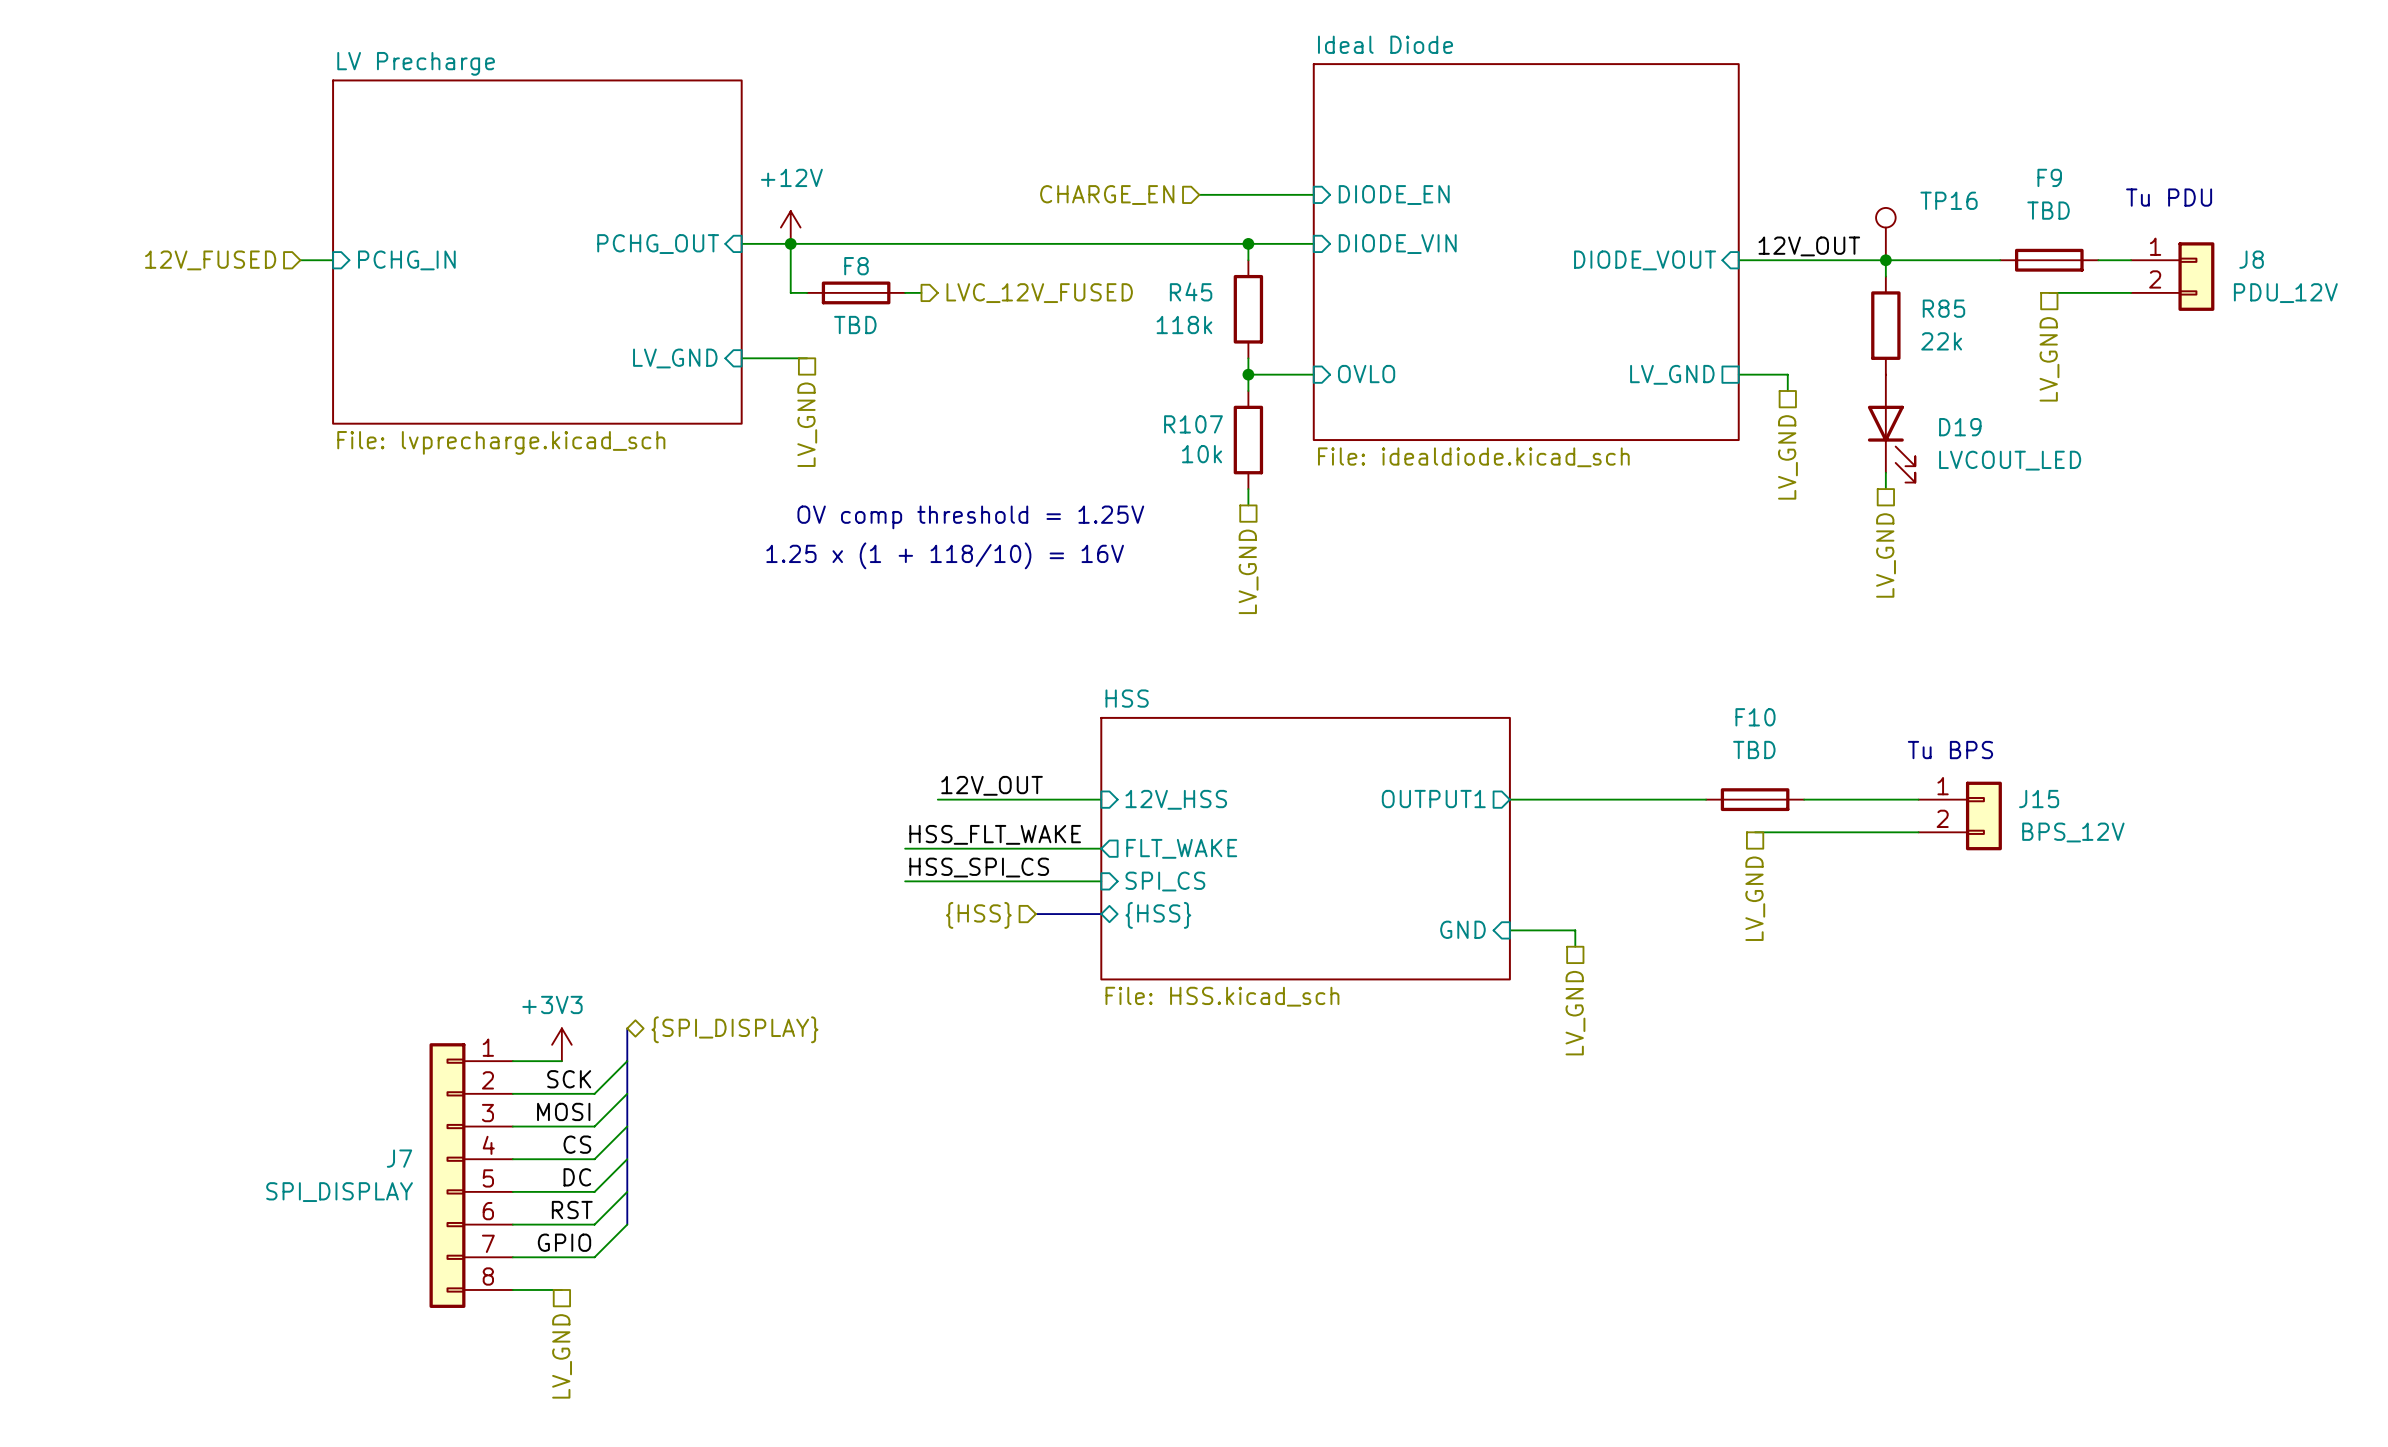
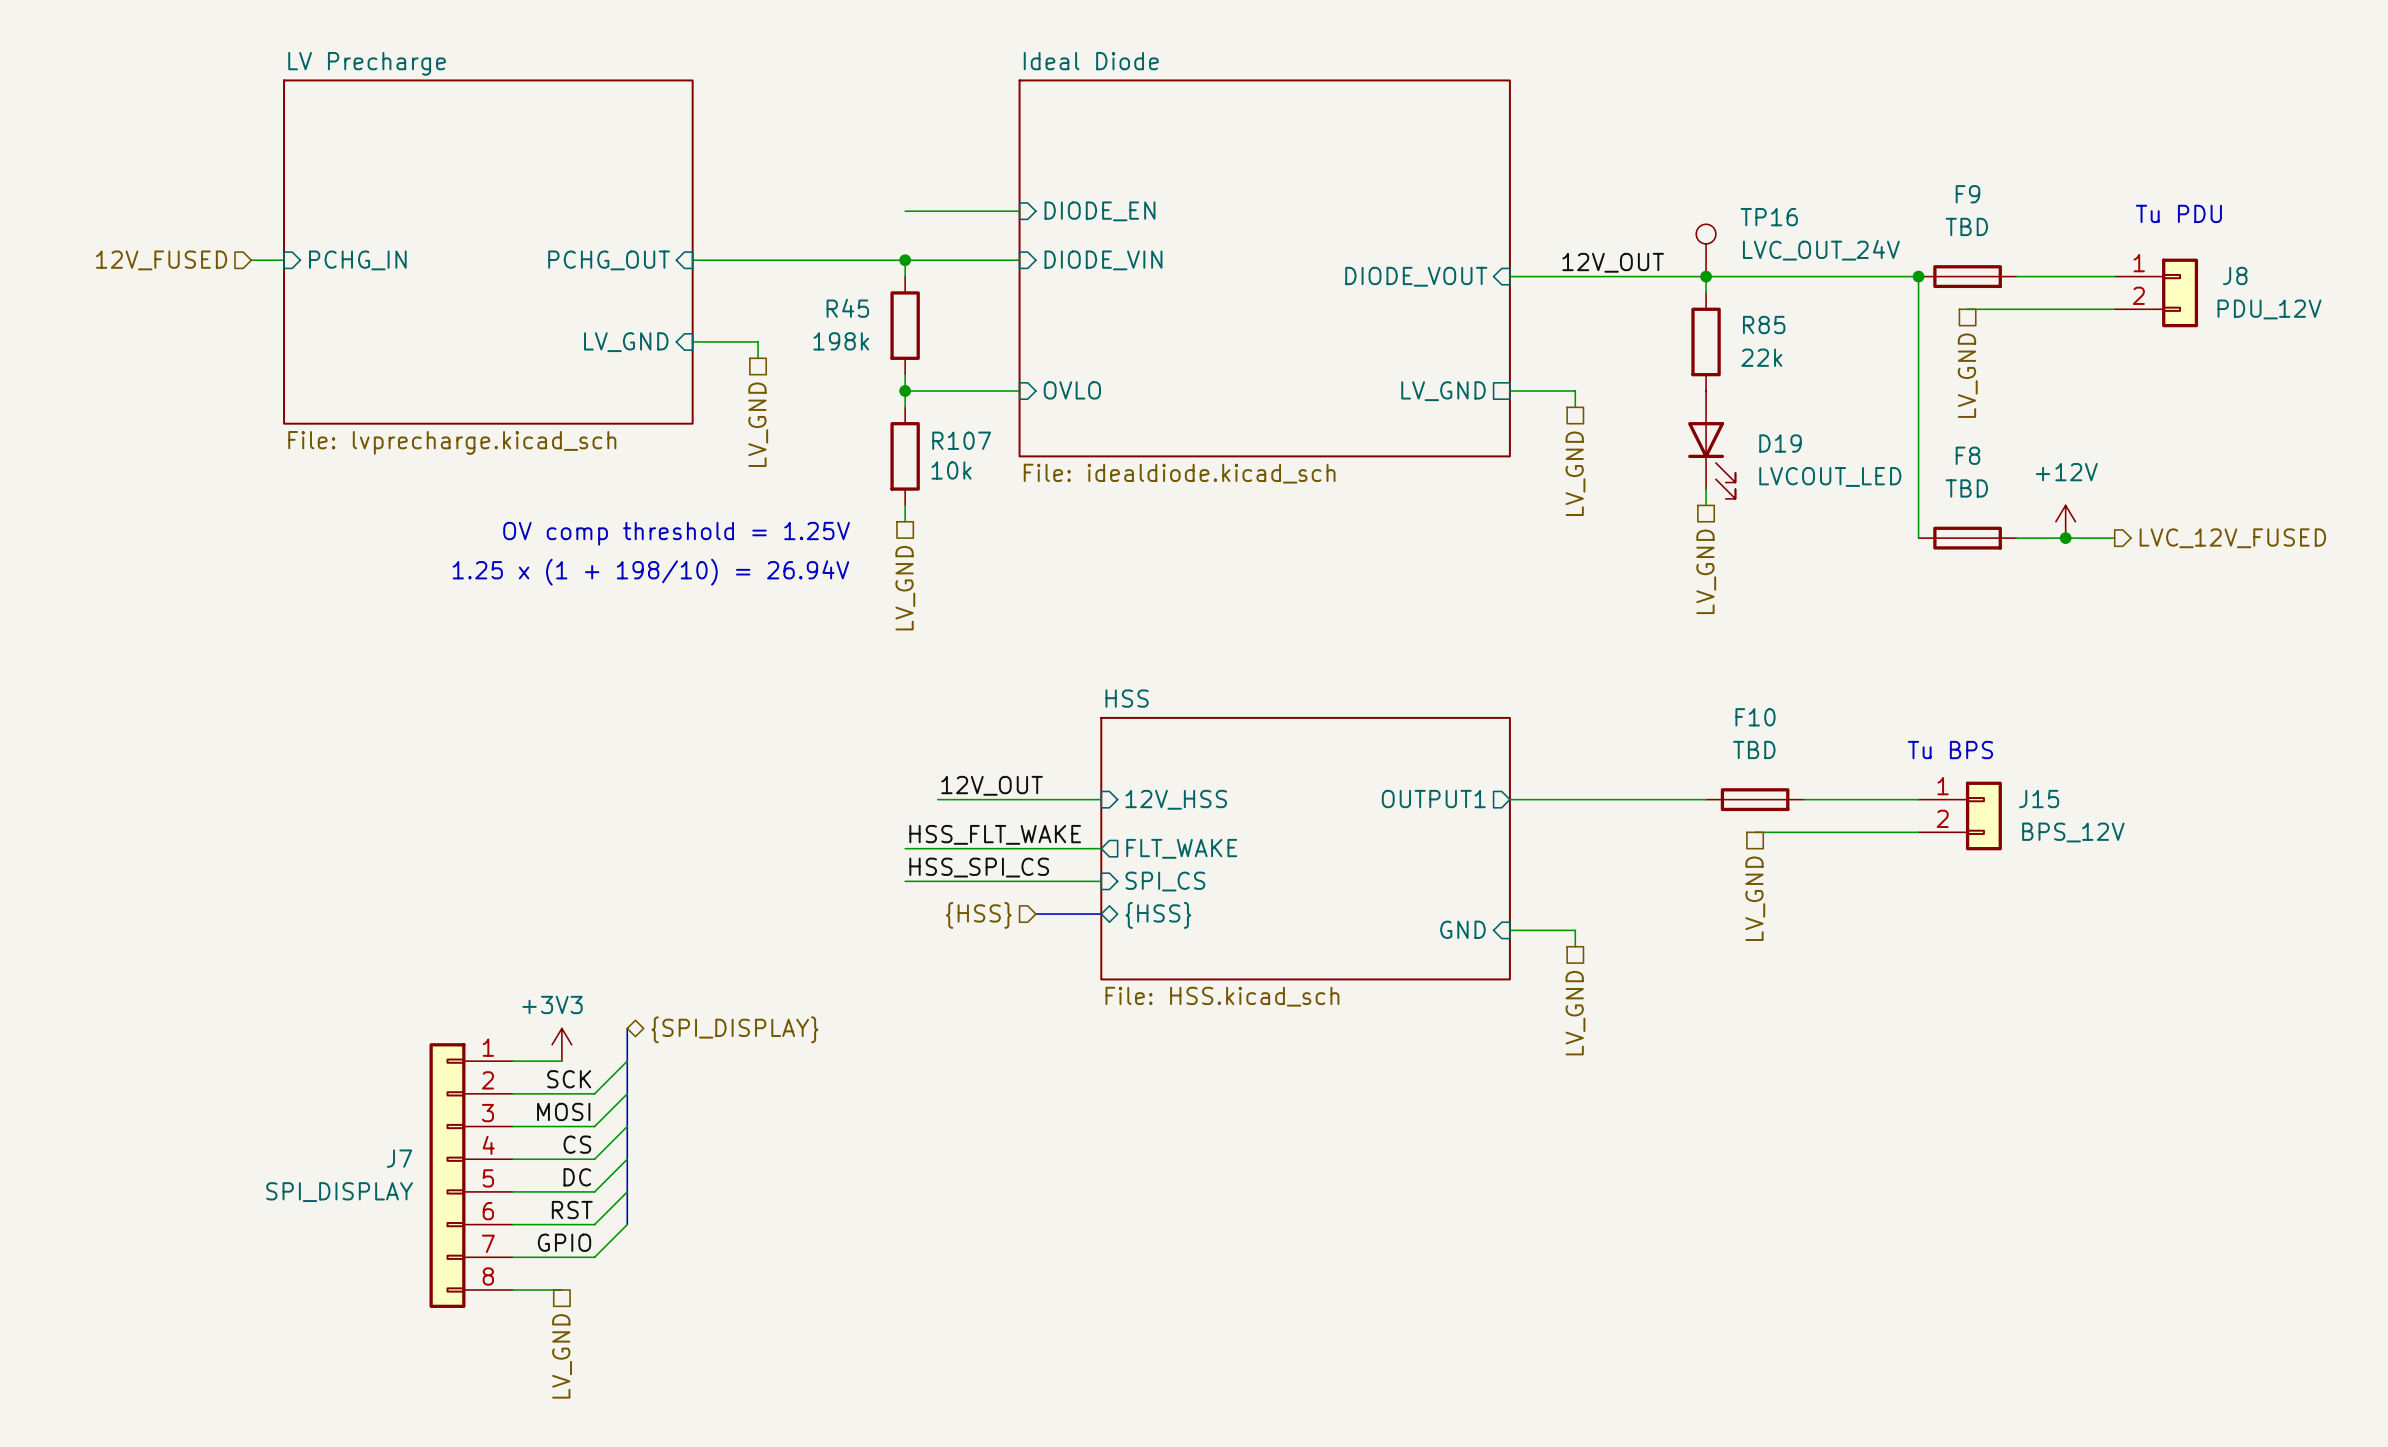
wire: (1199, 194) (1313, 194) -> (905, 211) (1019, 211)
hierarchical label: CHARGE_EN (1107, 195) -> none
sheet pin position: DIODE_EN (1394, 195) -> DIODE_EN (1099, 211)
text position: Tu PDU (2169, 197) -> Tu PDU (2178, 213)
power symbol: +12V (790, 227) -> none
TP16 position: (1885, 234) -> (1706, 250)
wire: (741, 243) (1313, 243) -> none
wire: (790, 243) (790, 292) (807, 292) -> none
junction: (790, 243) -> none
wire: (1248, 243) (1248, 260) -> none
junction: (1248, 243) -> none
sheet pin position: PCHG_OUT (658, 244) -> PCHG_OUT (609, 260)
sheet pin position: DIODE_VIN (1397, 244) -> DIODE_VIN (1103, 260)
label position: 12V_OUT (1809, 246) -> 12V_OUT (1613, 262)
TP16 value: none -> LVC_OUT_24V (1821, 250)
sheet LV Precharge position: (537, 252) -> (488, 252)
sheet Ideal Diode: File: idealdiode.kicad_sch (1526, 252) -> none
hierarchical label position: 12V_FUSED (210, 260) -> 12V_FUSED (161, 260)
wire: (300, 260) (333, 260) -> (251, 260) (284, 260)
sheet pin position: PCHG_IN (406, 260) -> PCHG_IN (357, 260)
wire: none -> (692, 260) (1019, 260)
wire: none -> (905, 260) (905, 276)
junction: none -> (905, 260)
sheet pin position: DIODE_VOUT (1645, 260) -> DIODE_VOUT (1416, 276)
wire: (1738, 260) (2000, 260) -> none
wire: (1885, 260) (1885, 276) -> (1706, 276) (1706, 292)
junction position: (1885, 260) -> (1918, 276)
F9 position: (2049, 260) -> (1967, 276)
wire: (2098, 260) (2131, 260) -> none
F8 name position: F8 (856, 266) -> F8 (1967, 455)
sheet Ideal Diode: none -> File: idealdiode.kicad_sch (1264, 268)
wire: none -> (1509, 276) (1918, 276) (1918, 538)
junction: none -> (1706, 276)
wire: none -> (2016, 276) (2114, 276)
J8 position: (2172, 276) -> (2156, 292)
F8 position: (856, 292) -> (1967, 538)
wire: (2049, 292) (2131, 292) -> none
hierarchical label: LVC_12V_FUSED (1039, 293) -> none
R45 position: (1248, 309) -> (905, 325)
wire: none -> (1967, 309) (2114, 309)
F8 value position: TBD (855, 325) -> TBD (1966, 488)
R45 value: 118k (1184, 325) -> 198k (841, 341)
R85 position: (1885, 325) -> (1706, 341)
wire: none -> (692, 341) (758, 341) (758, 358)
sheet pin position: LV_GND (675, 358) -> LV_GND (626, 342)
wire: (741, 358) (807, 358) -> none
wire: (1248, 358) (1248, 391) -> none
hierarchical label position: LV_GND (2049, 359) -> LV_GND (1967, 375)
wire: none -> (905, 374) (905, 407)
wire: (1248, 374) (1313, 374) -> none
junction: (1248, 374) -> none
sheet pin position: OVLO (1366, 374) -> OVLO (1072, 390)
sheet pin position: LV_GND (1672, 374) -> LV_GND (1443, 391)
wire: (1738, 374) (1787, 374) (1787, 391) -> none
wire: none -> (905, 391) (1019, 391)
junction: none -> (905, 391)
wire: none -> (1509, 391) (1575, 391) (1575, 407)
hierarchical label position: LV_GND (807, 424) -> LV_GND (758, 424)
R107 name position: R107 (1193, 424) -> R107 (961, 440)
D19 position: (1891, 428) -> (1711, 444)
R107 position: (1248, 440) -> (905, 456)
R107 value position: 10k (1202, 454) -> 10k (951, 470)
hierarchical label: LV_GND (1787, 457) -> none
wire: (1885, 472) (1885, 489) -> (1706, 489) (1706, 505)
hierarchical label: none -> LV_GND (1575, 473)
wire: (1248, 489) (1248, 505) -> none
wire: none -> (905, 505) (905, 521)
text position: OV comp threshold = 1.25V (970, 517) -> OV comp threshold = 1.25V (676, 533)
power symbol: none -> +12V (2065, 521)
wire: none -> (2016, 538) (2114, 538)
junction: none -> (2065, 538)
hierarchical label: none -> LVC_12V_FUSED (2232, 538)
text: 1.25 x (1 + 118/10) = 16V (945, 555) -> 1.25 x (1 + 198/10) = 26.94V (650, 572)
hierarchical label: LV_GND (1886, 555) -> none
hierarchical label: LV_GND (1248, 571) -> none
hierarchical label: none -> LV_GND (1706, 571)
hierarchical label: none -> LV_GND (905, 588)

